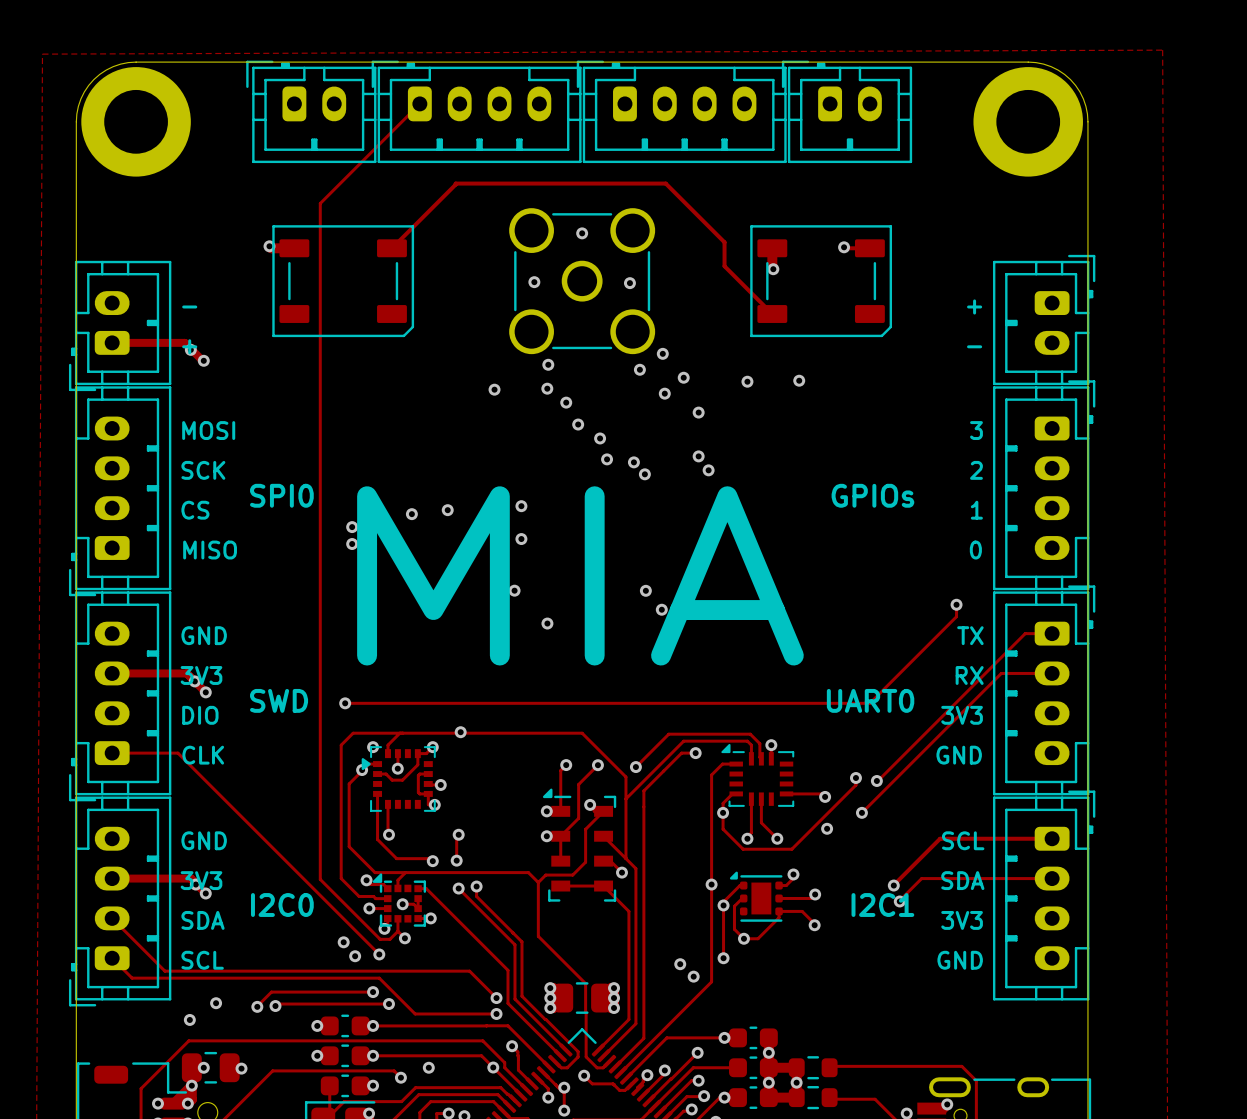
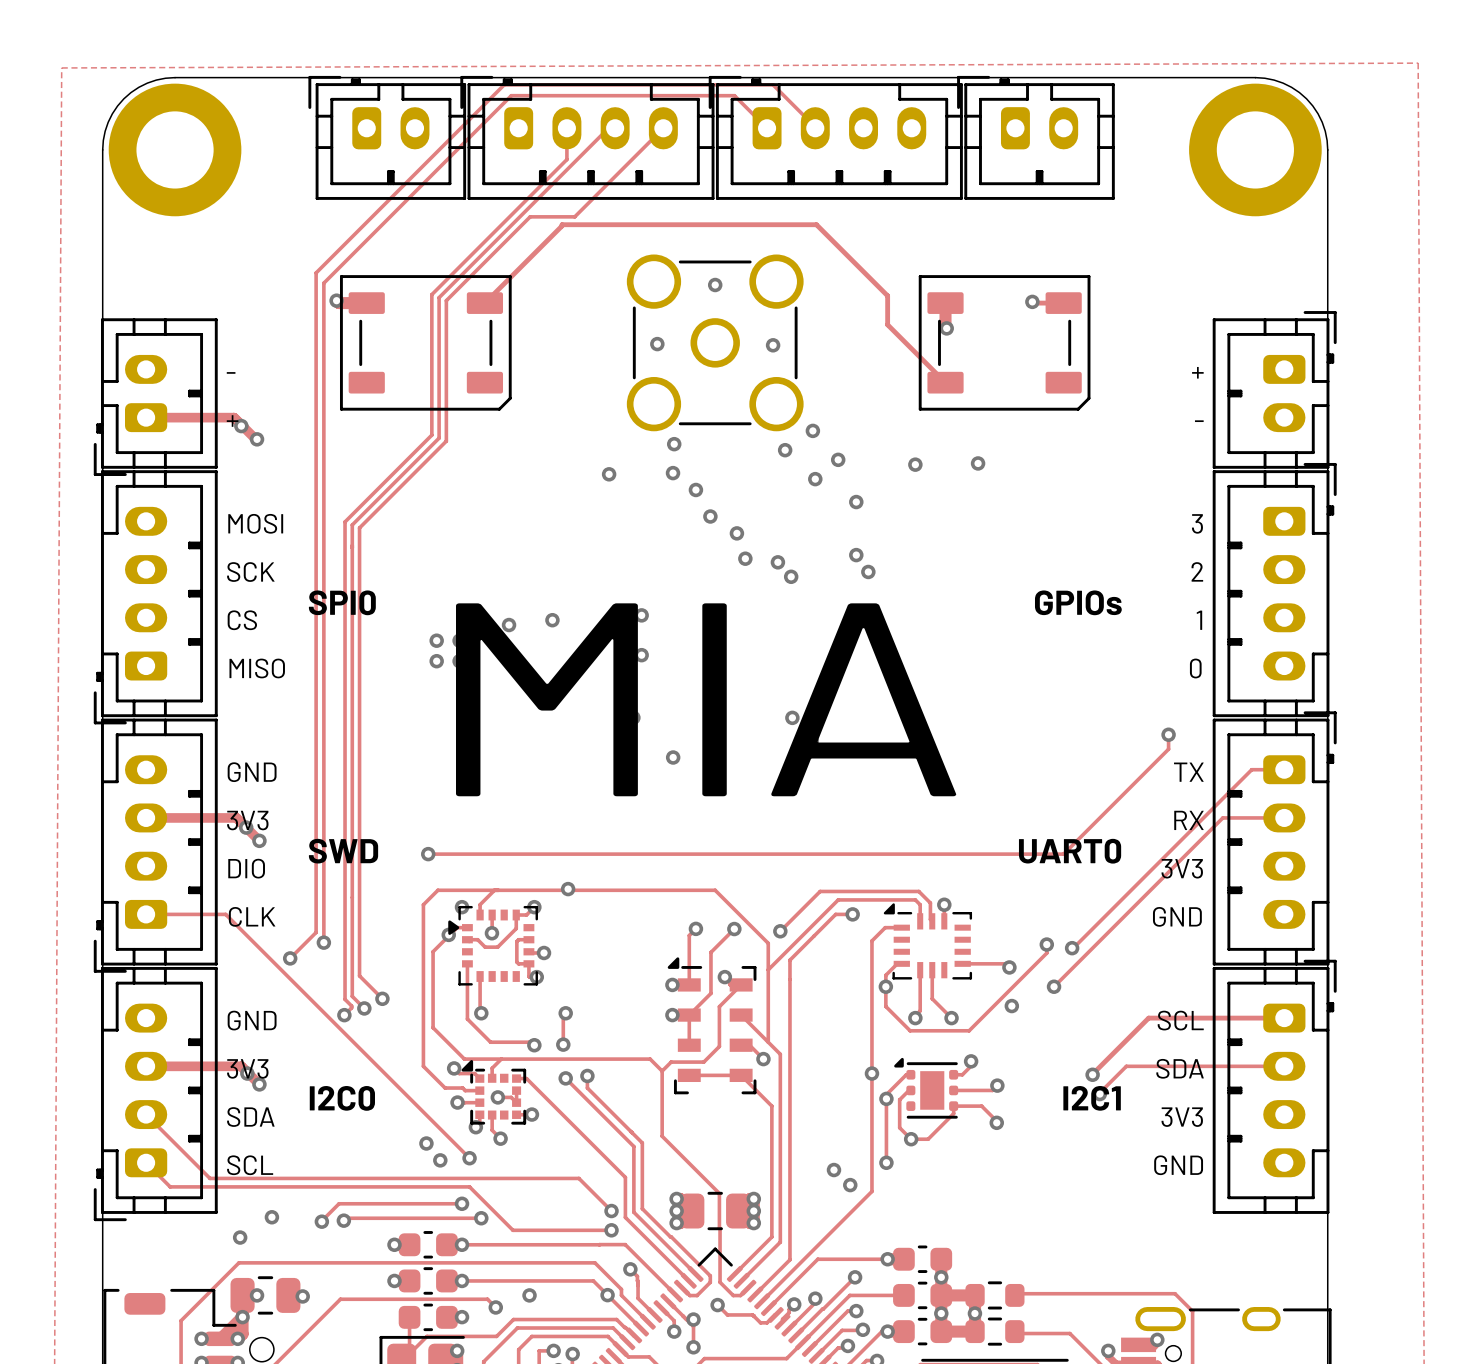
track: (419, 103) (320, 203) (320, 879) (380, 939) (389, 939) (397, 931) -> none
track: none -> (566, 128) (566, 159) (431, 294) (431, 435) (345, 521) (345, 999) (351, 1007) (344, 1015)
track: none -> (615, 128) (608, 128) (439, 297) (439, 438) (352, 524) (352, 996) (364, 1008)
track: none -> (663, 128) (574, 216) (530, 216) (446, 300) (446, 441) (359, 527) (359, 975) (382, 998)
track: none -> (767, 128) (734, 95) (511, 95) (323, 283) (323, 942)
track: none -> (815, 128) (773, 84) (504, 84) (316, 272) (316, 932) (290, 958)
via: none -> (323, 942)
via: none -> (290, 958)
via: none -> (382, 998)
via: none -> (364, 1008)
via: none -> (344, 1015)

